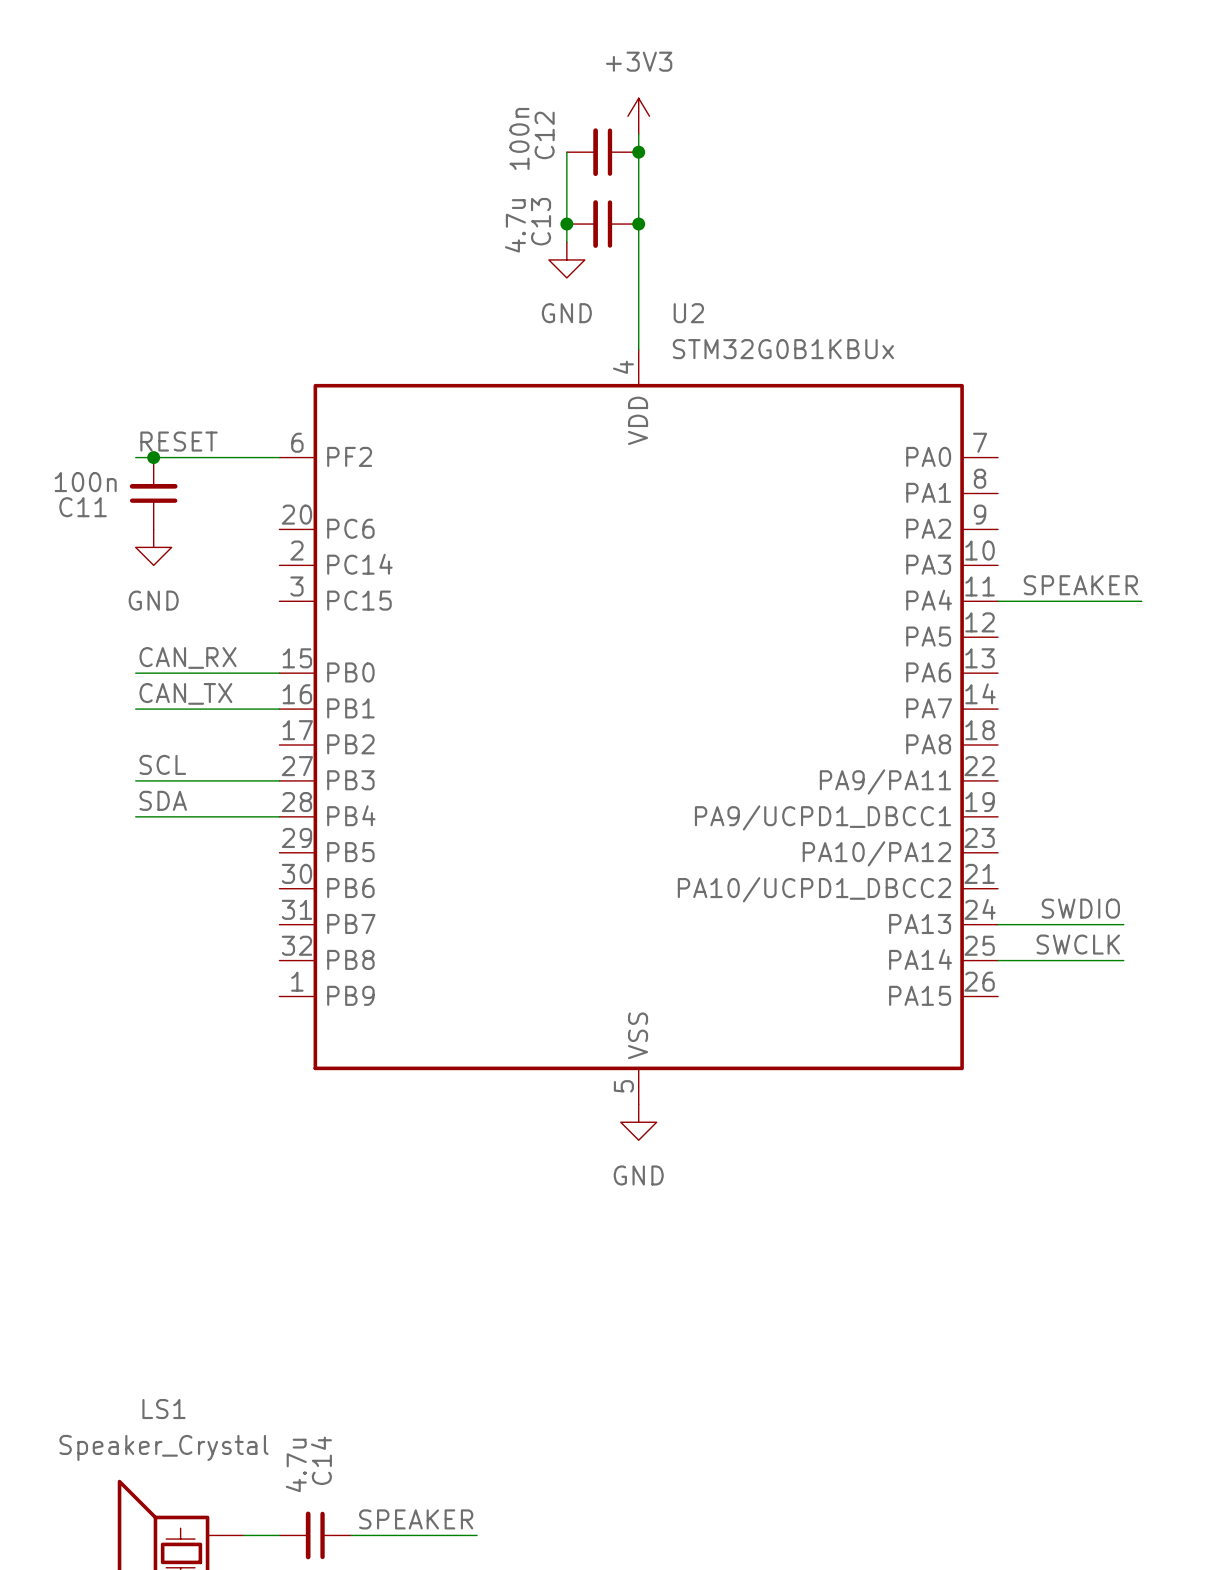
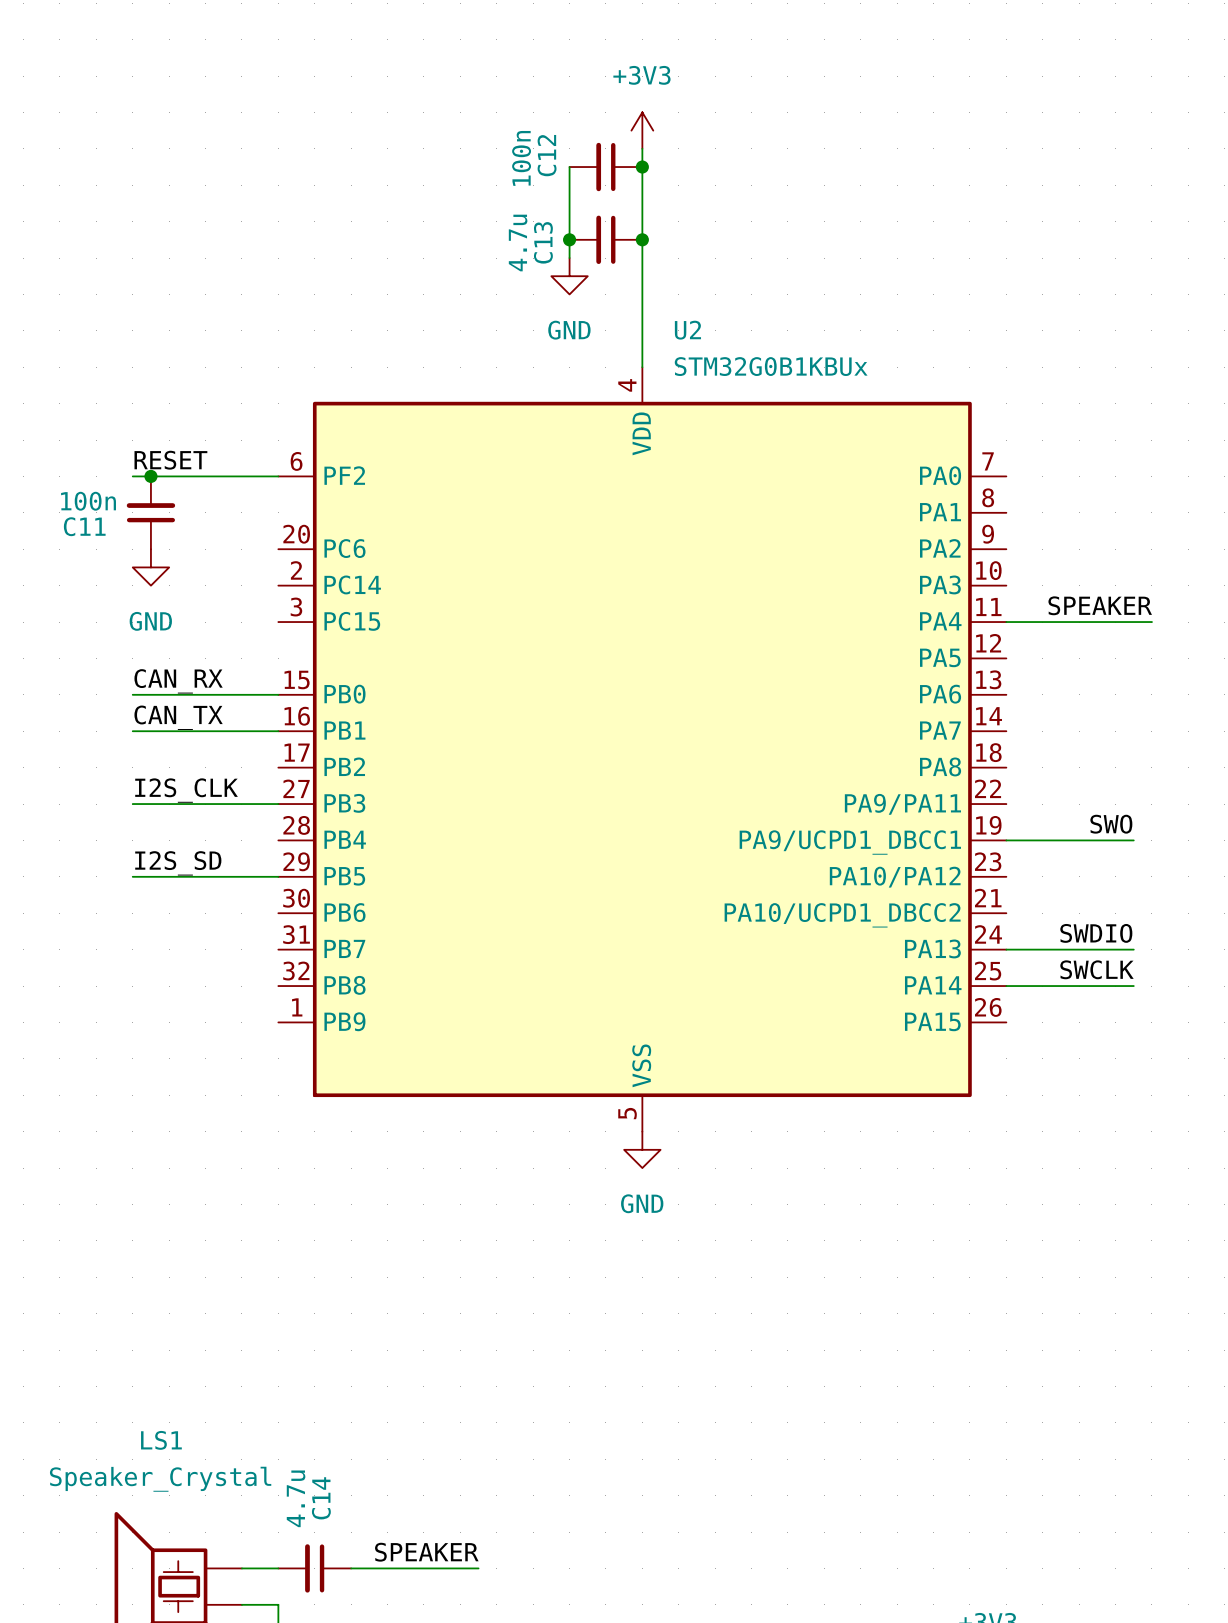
label: SCL (162, 764) -> I2S_CLK (186, 790)
label: SDA (163, 800) -> none
label: none -> SWO (1111, 824)
wire: (135, 816) (279, 816) -> (132, 876) (278, 876)
wire: none -> (1006, 840) (1133, 840)
label: none -> I2S_SD (178, 863)

